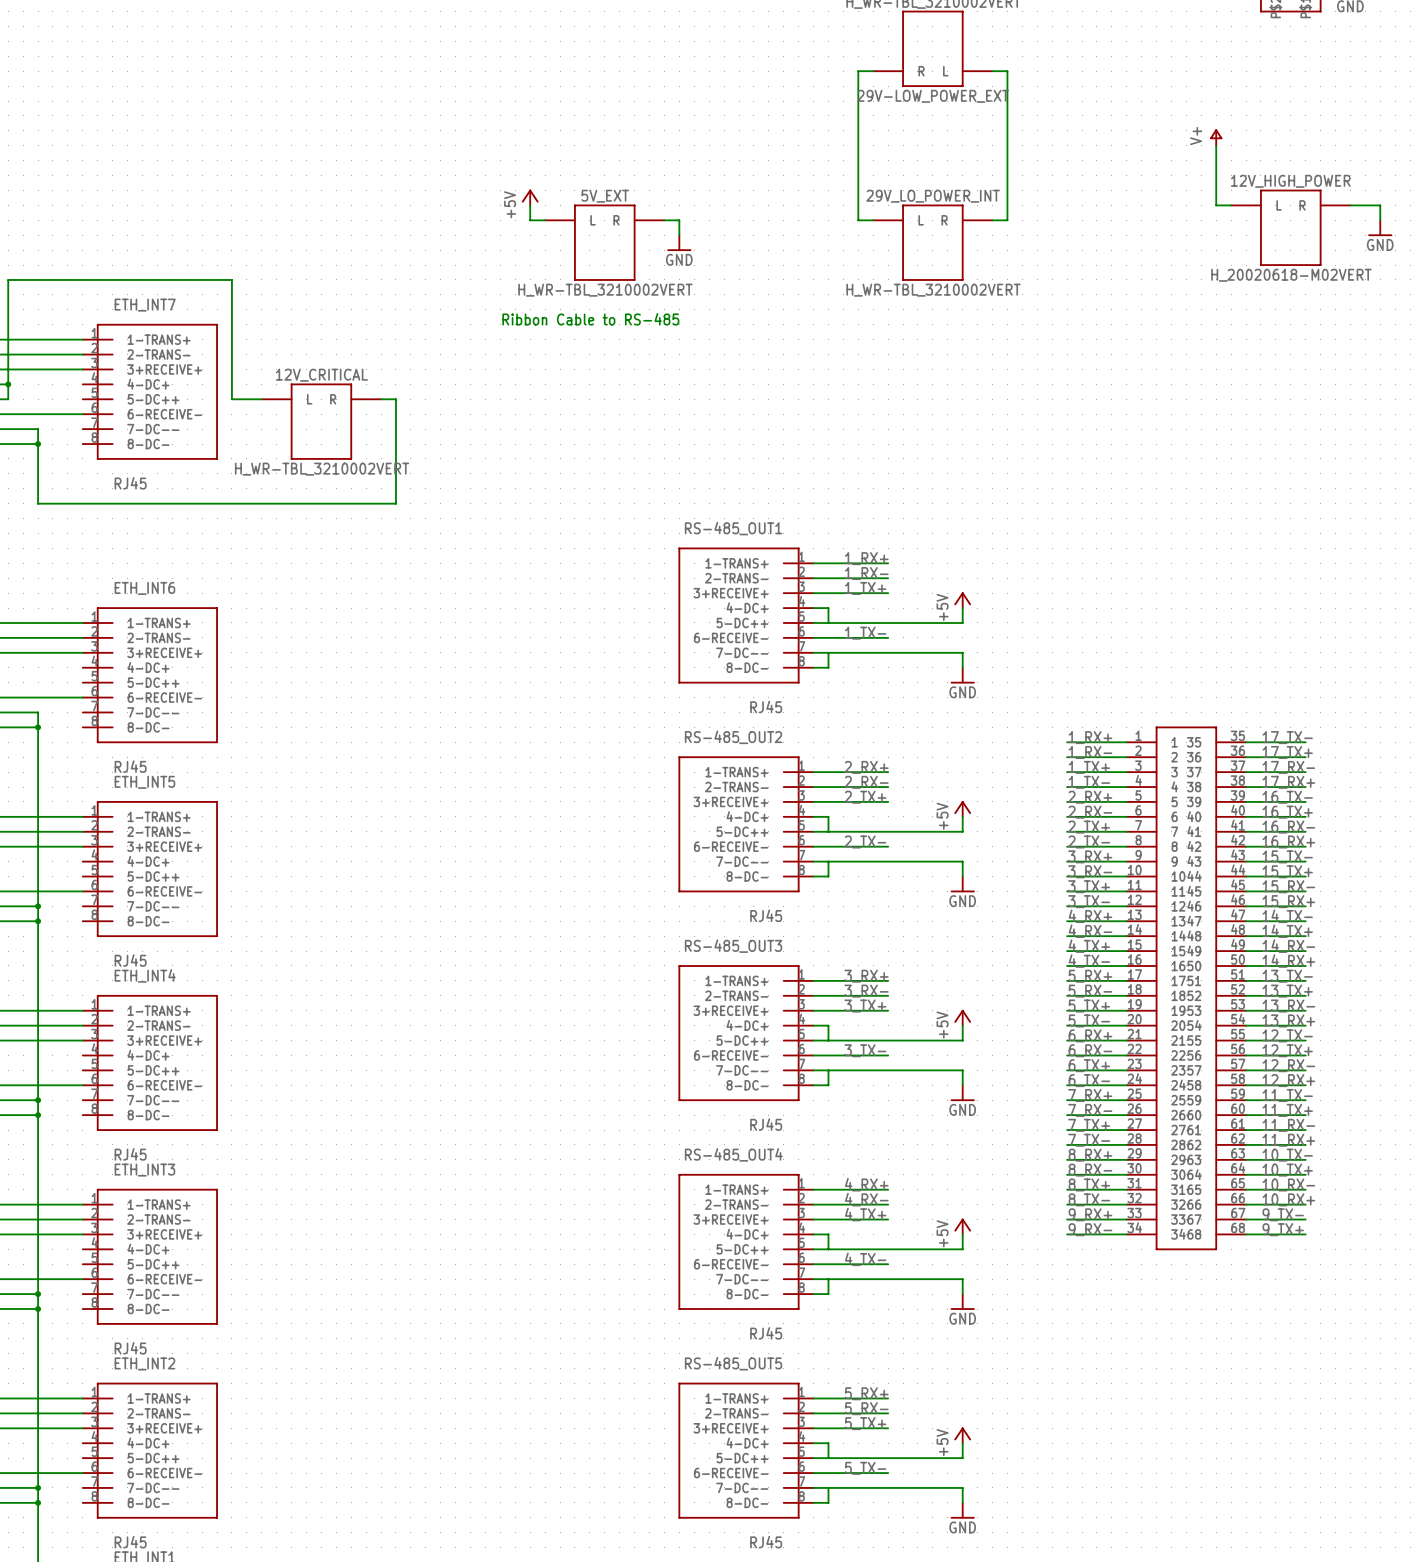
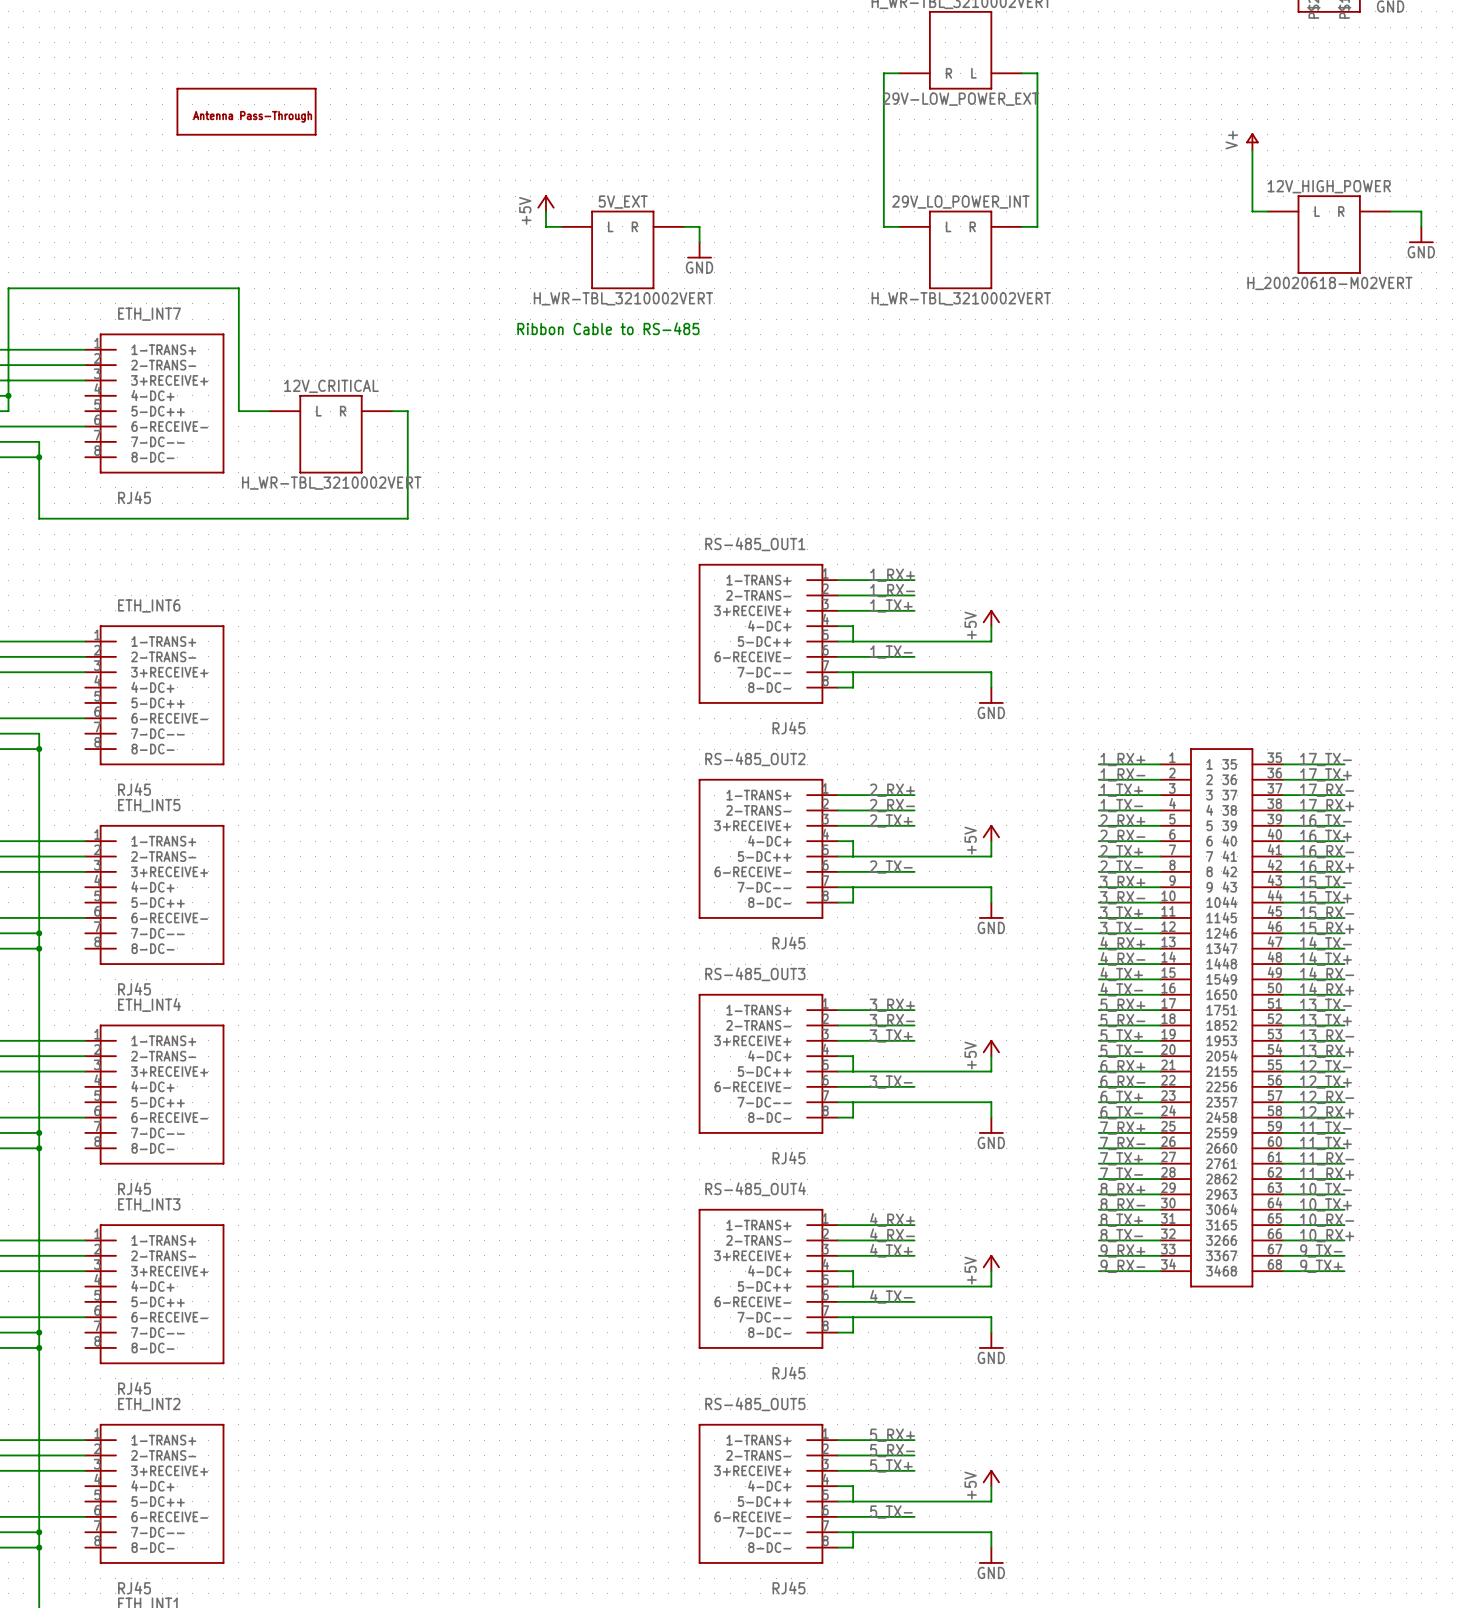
part: none -> (246, 111)

